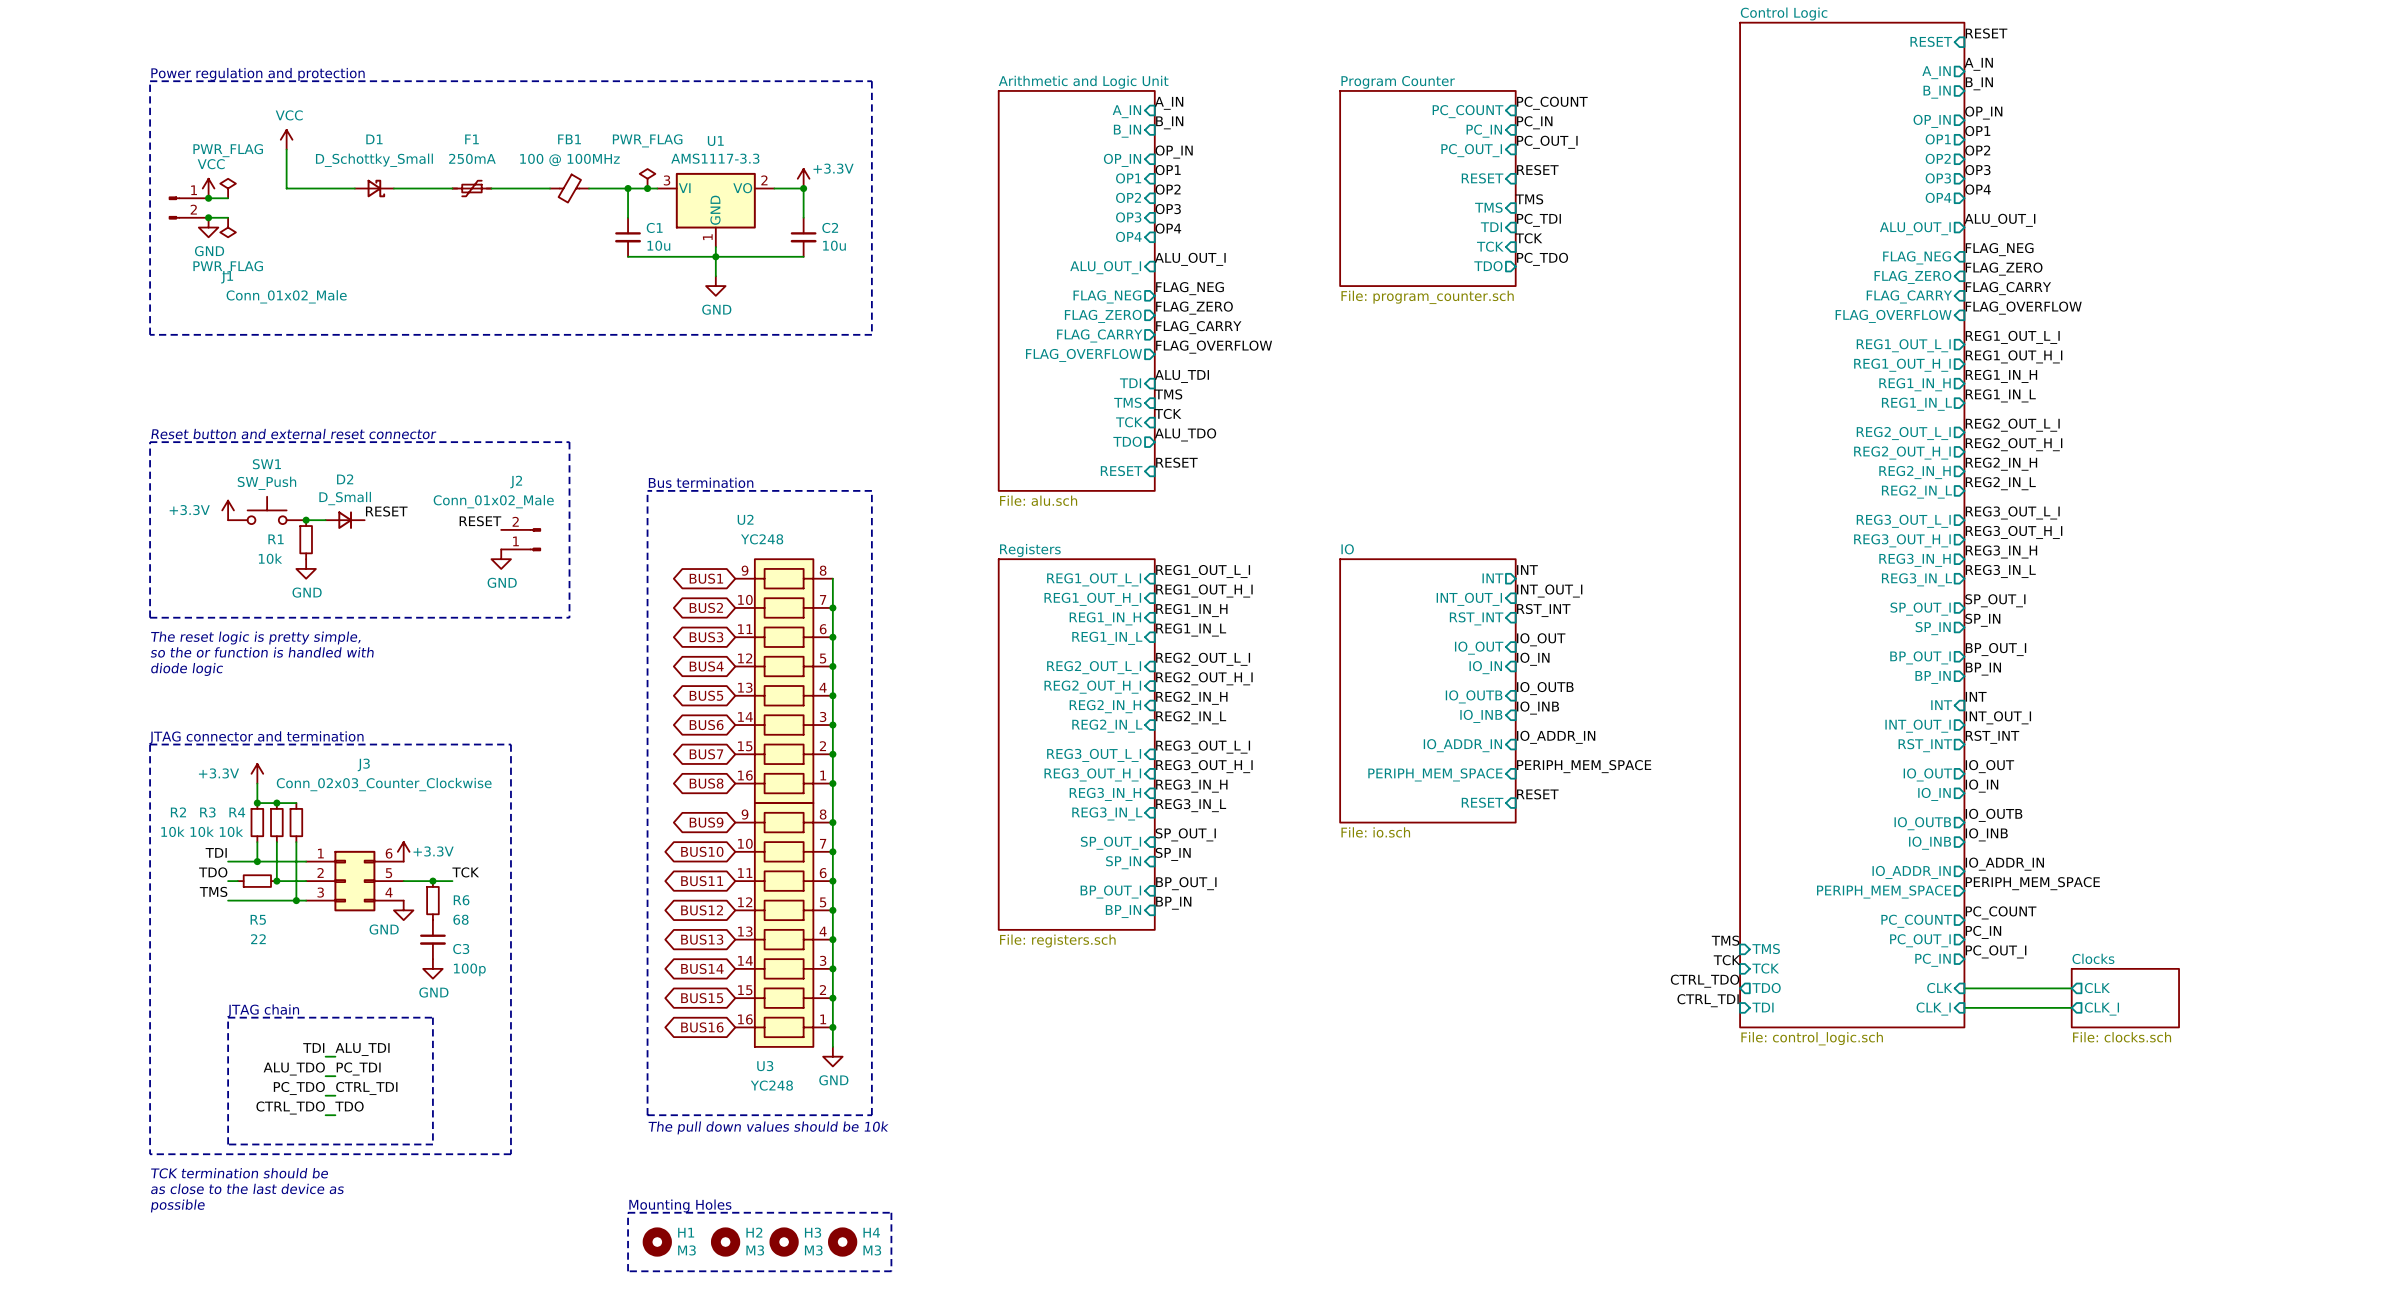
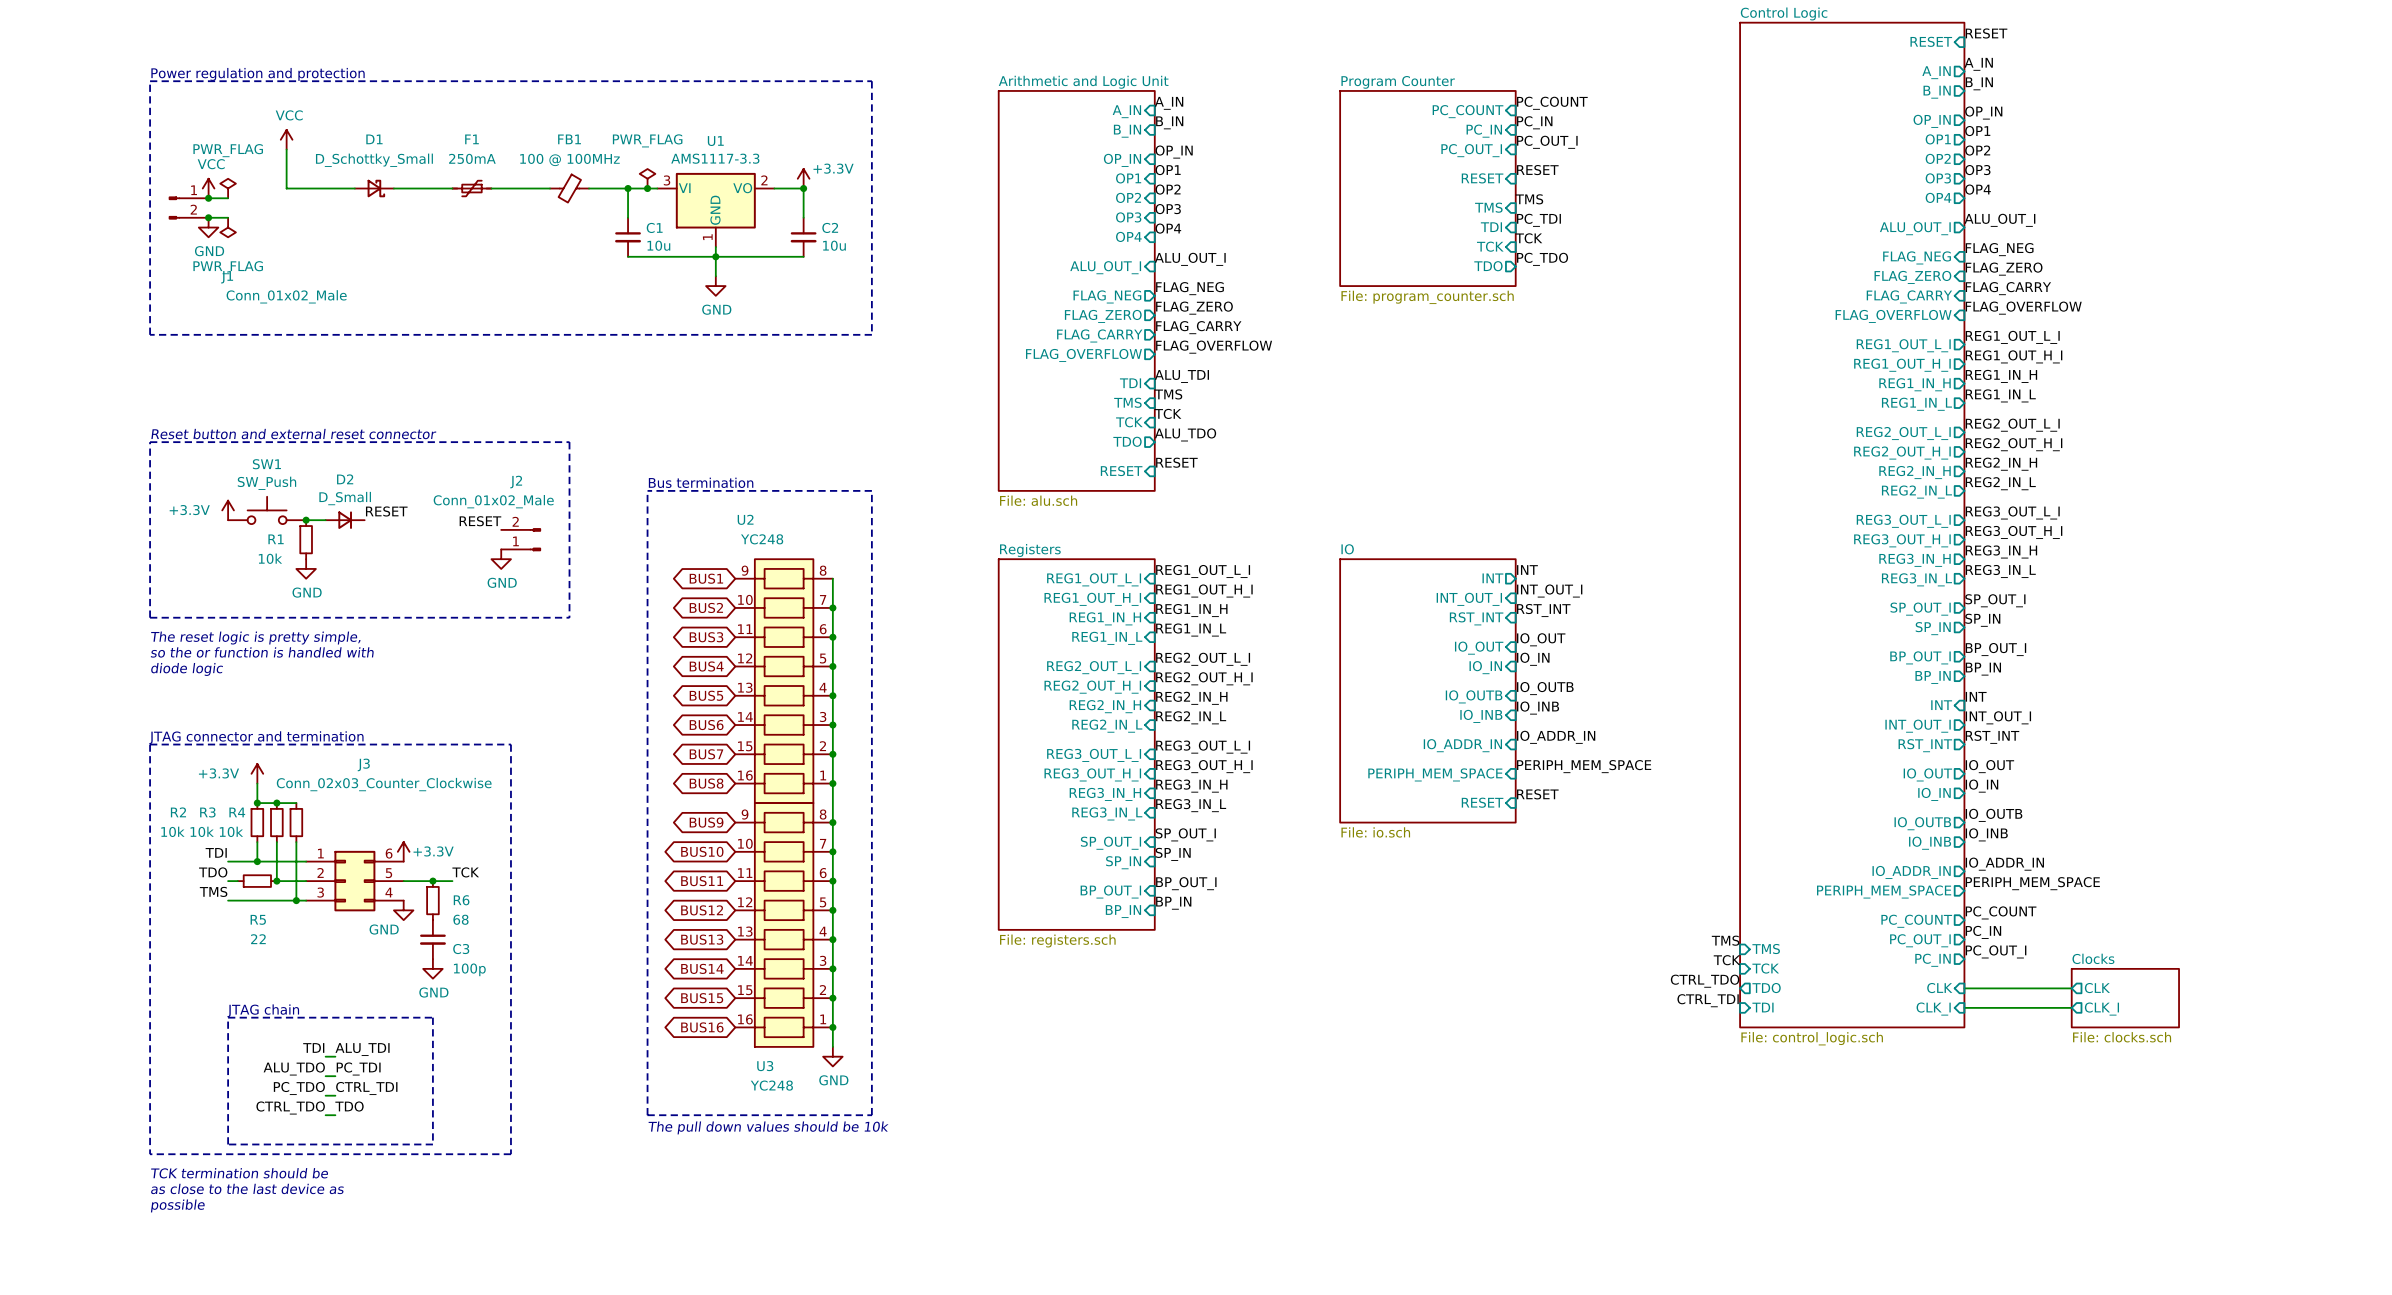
text: Mounting Holes (680, 1205) -> none
line: (628, 1212) (891, 1212) (891, 1271) (628, 1271) (628, 1212) -> none
H1: M3 (657, 1242) -> none
H2: M3 (725, 1242) -> none
H3: M3 (784, 1242) -> none
H4: M3 (842, 1242) -> none

